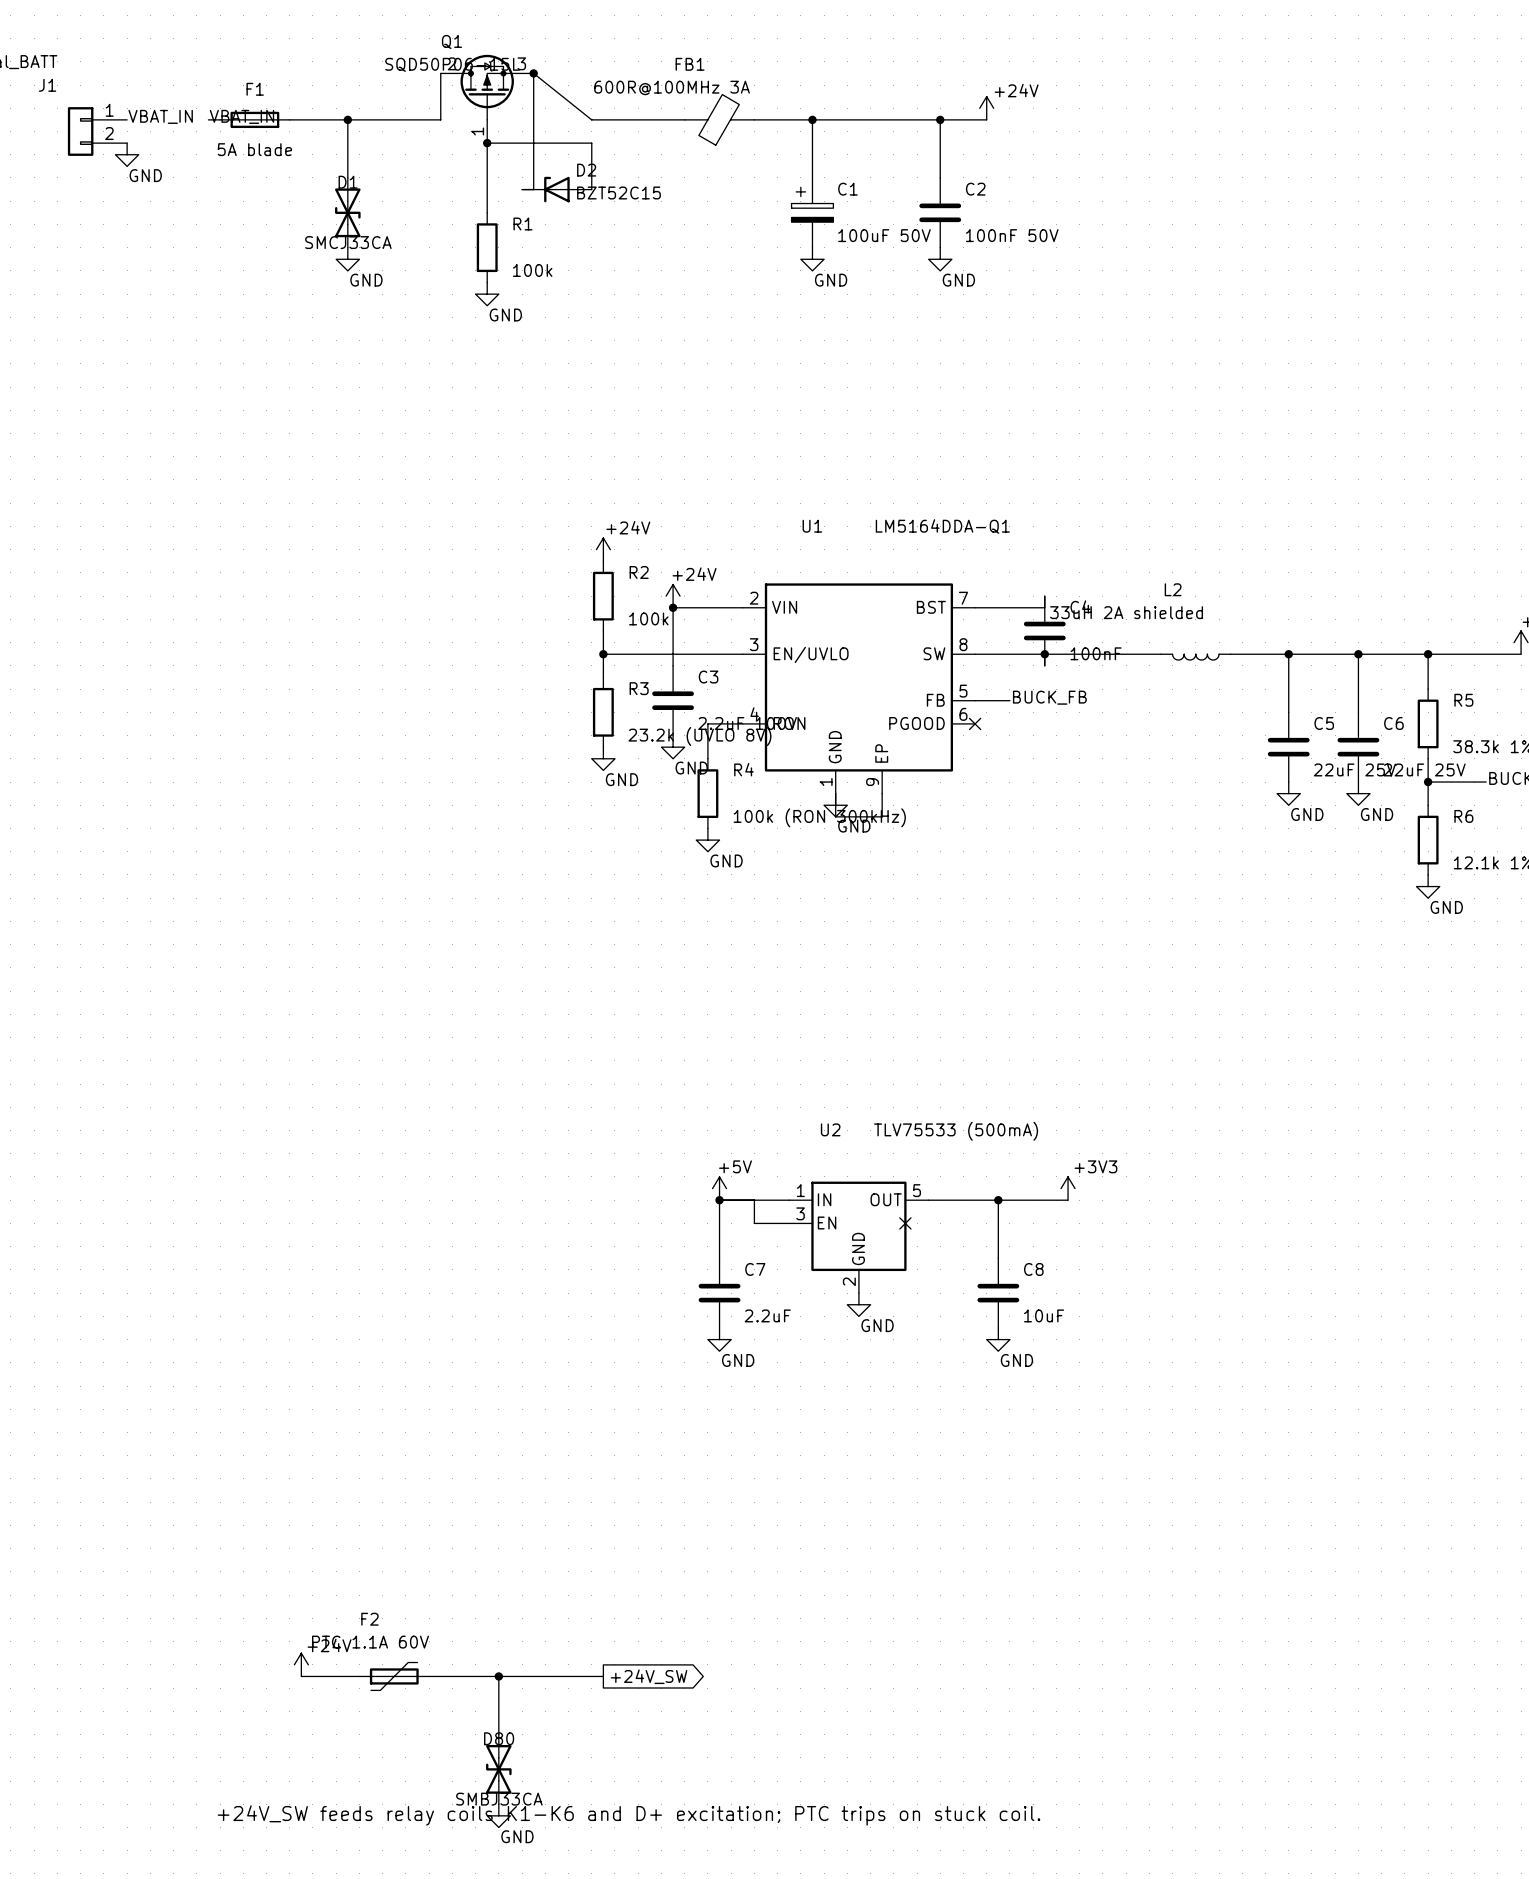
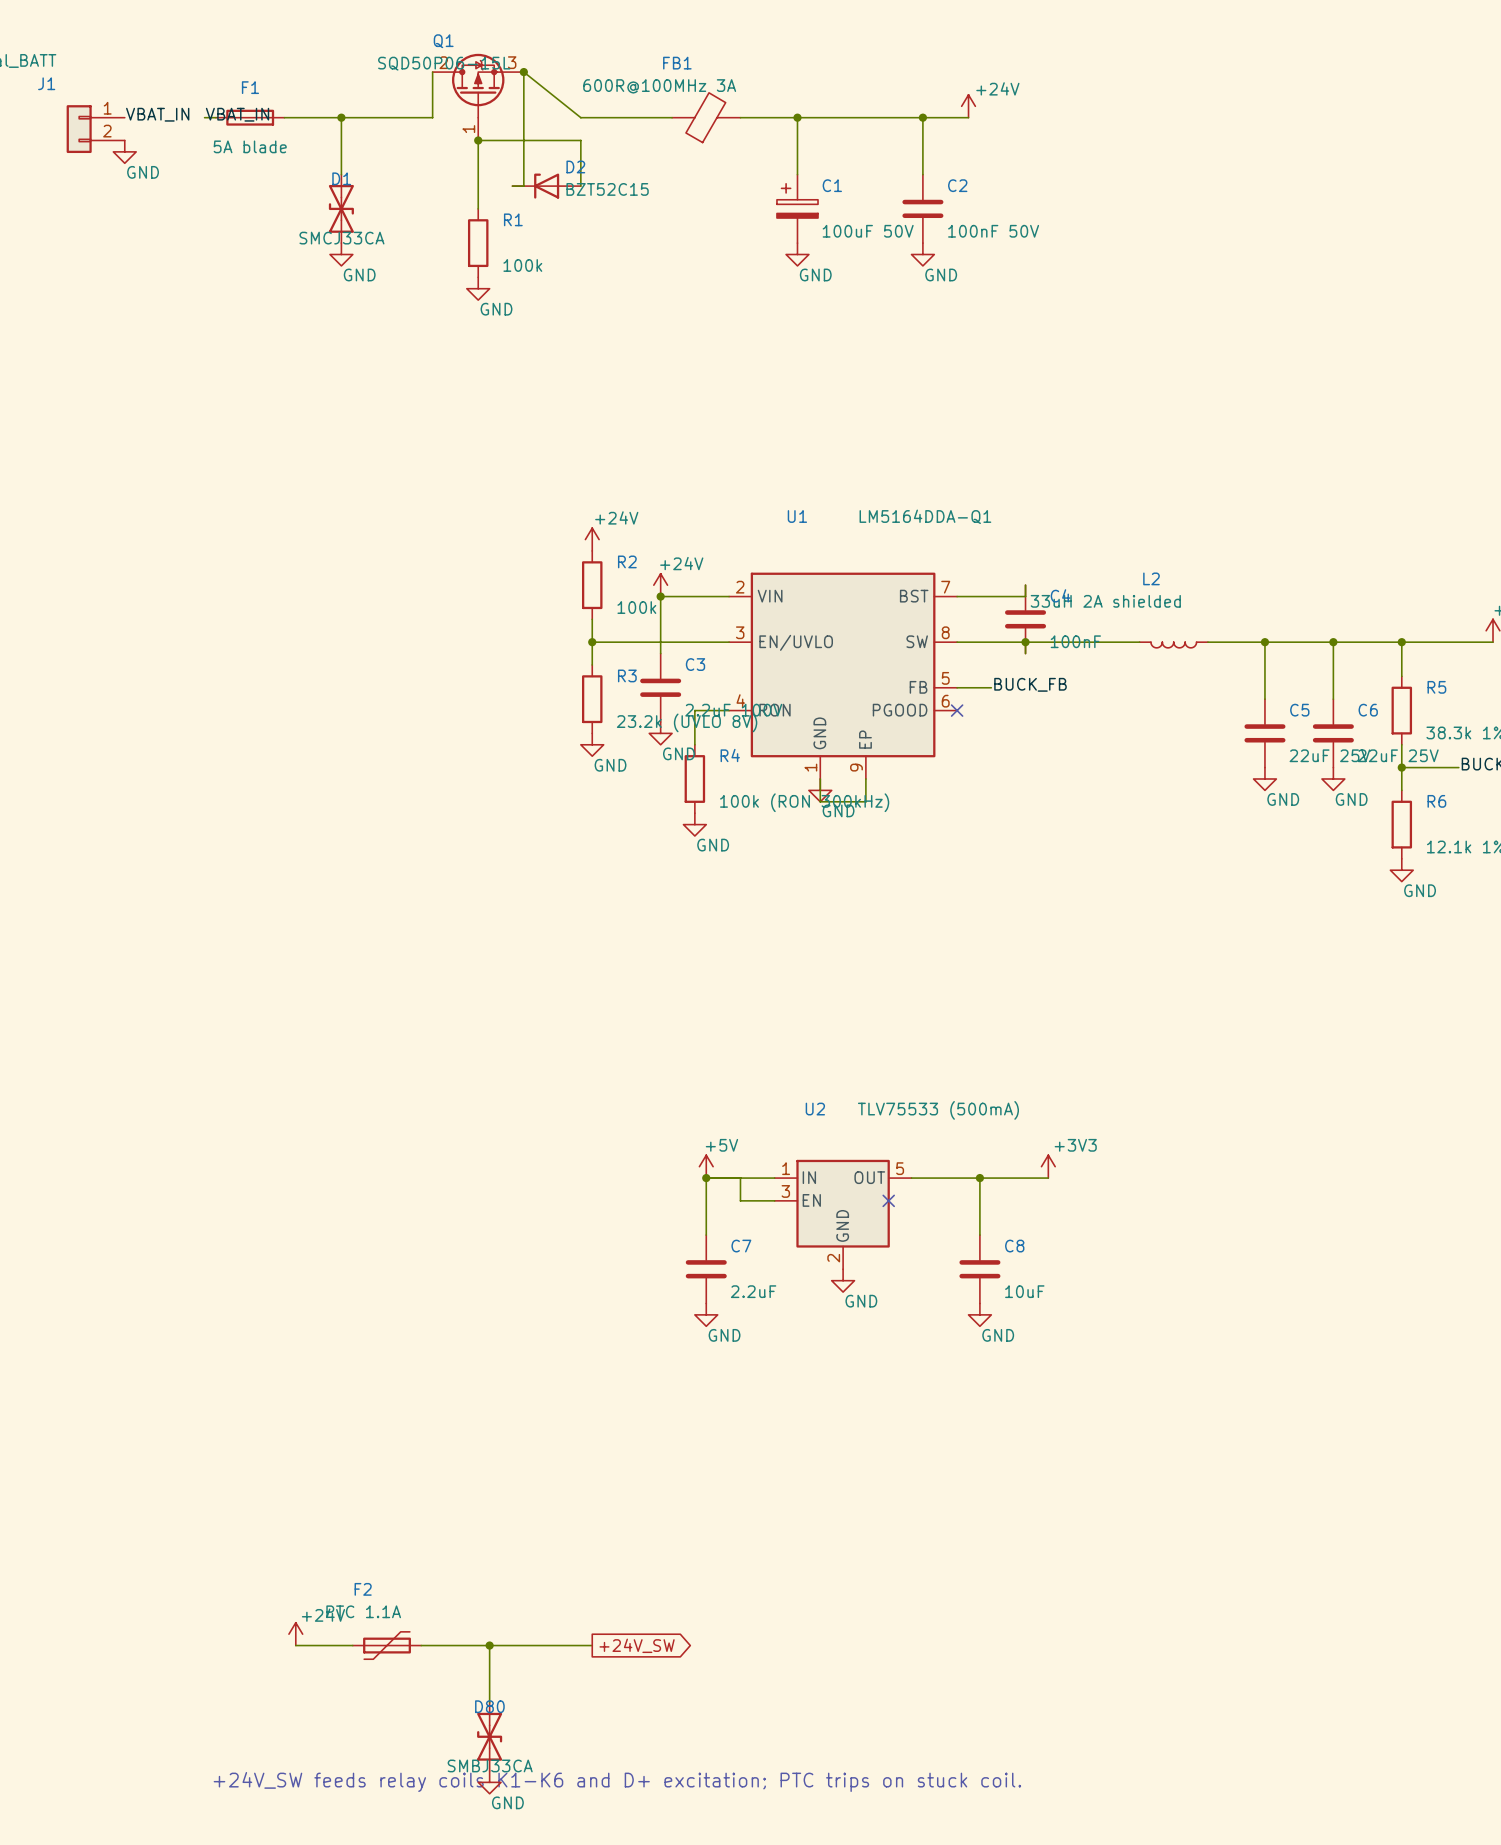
F2 value: PTC 1.1A 60V (370, 1642) -> PTC 1.1A (363, 1611)

